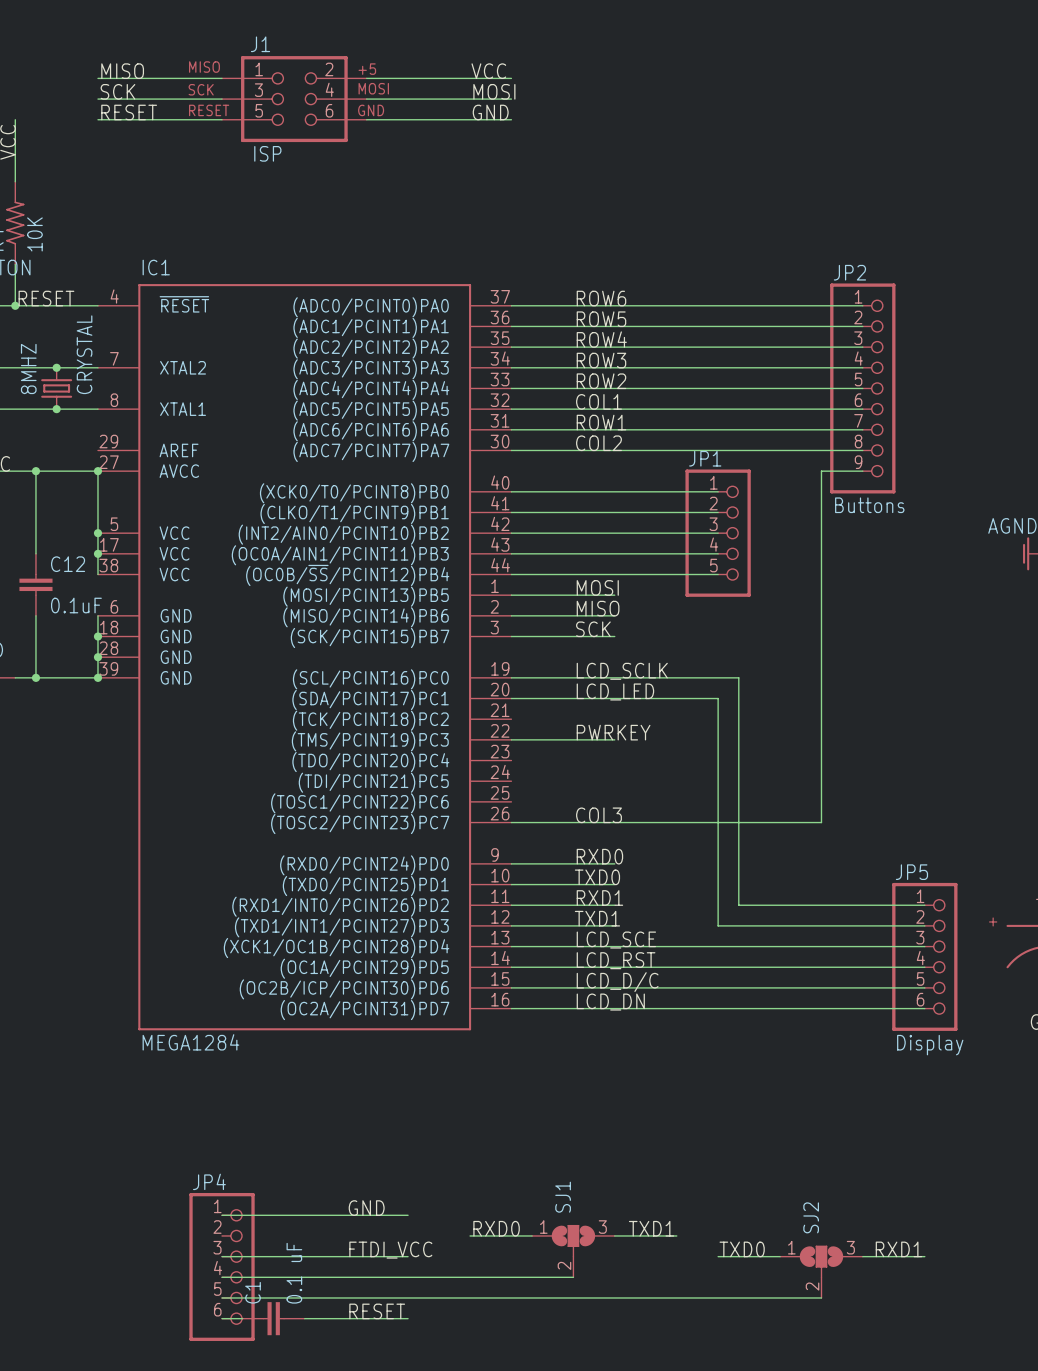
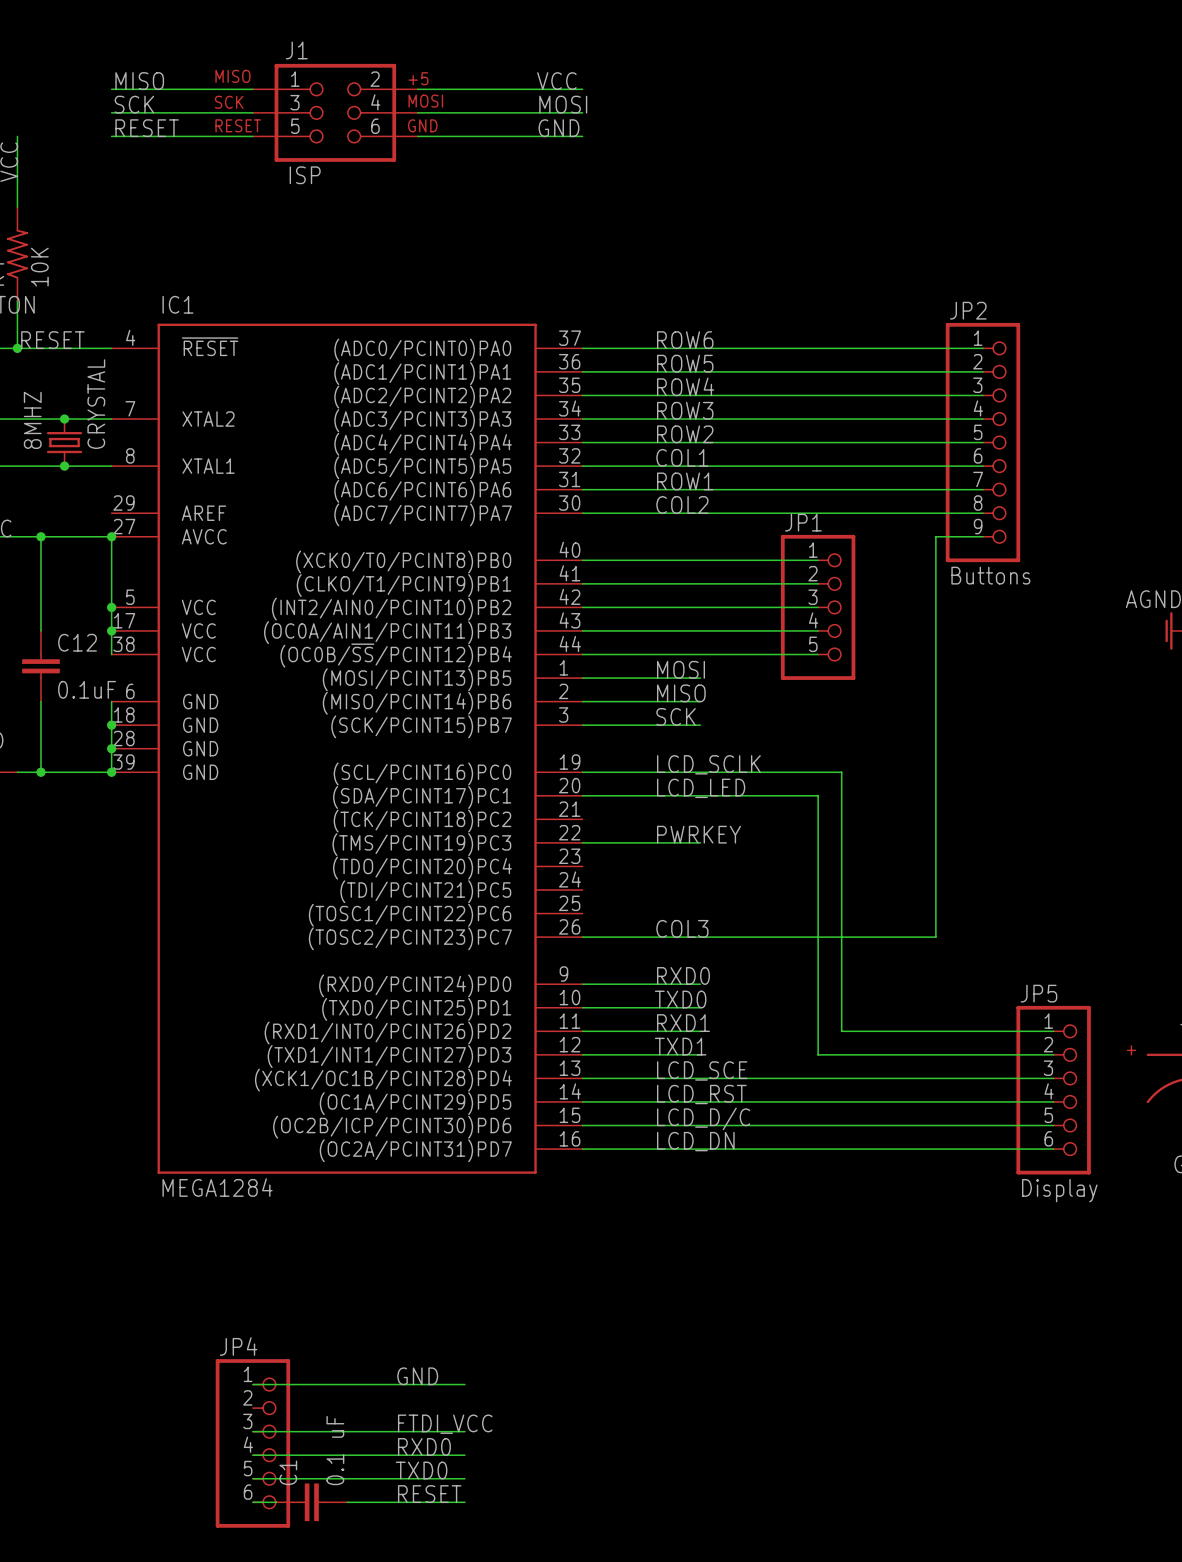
label position: RXD0 (496, 1228) -> RXD0 (424, 1446)
label: TXD1 (651, 1228) -> none
wire: (470, 1235) (532, 1235) -> none
wire: (614, 1235) (676, 1235) -> none
label: TXD0 (742, 1249) -> none
label: RXD1 (898, 1249) -> none
SJ1: (573, 1251) -> none
wire: (718, 1256) (780, 1256) -> none
wire: (862, 1256) (924, 1256) -> none
SJ2: (821, 1271) -> none
wire: (408, 1277) (573, 1277) -> none
label: none -> TXD0 (421, 1470)
wire: (408, 1297) (821, 1297) -> none

